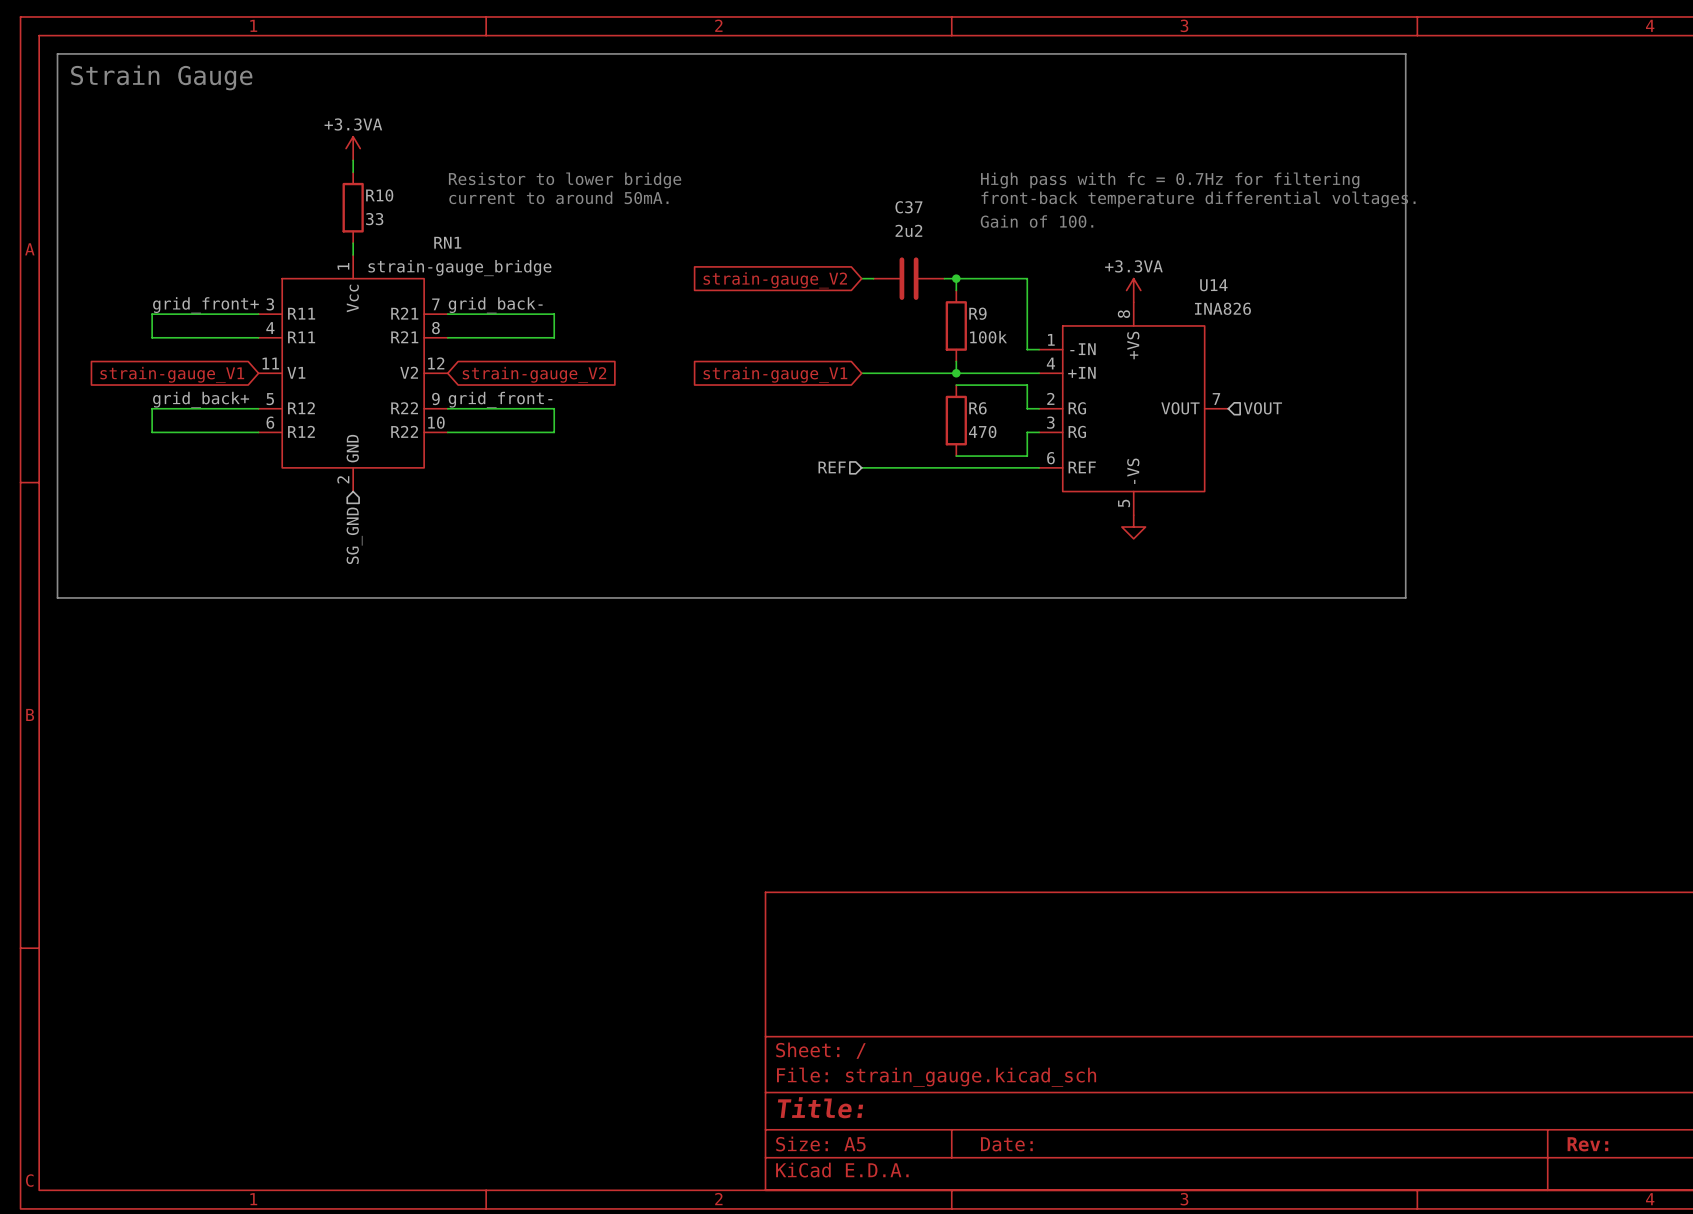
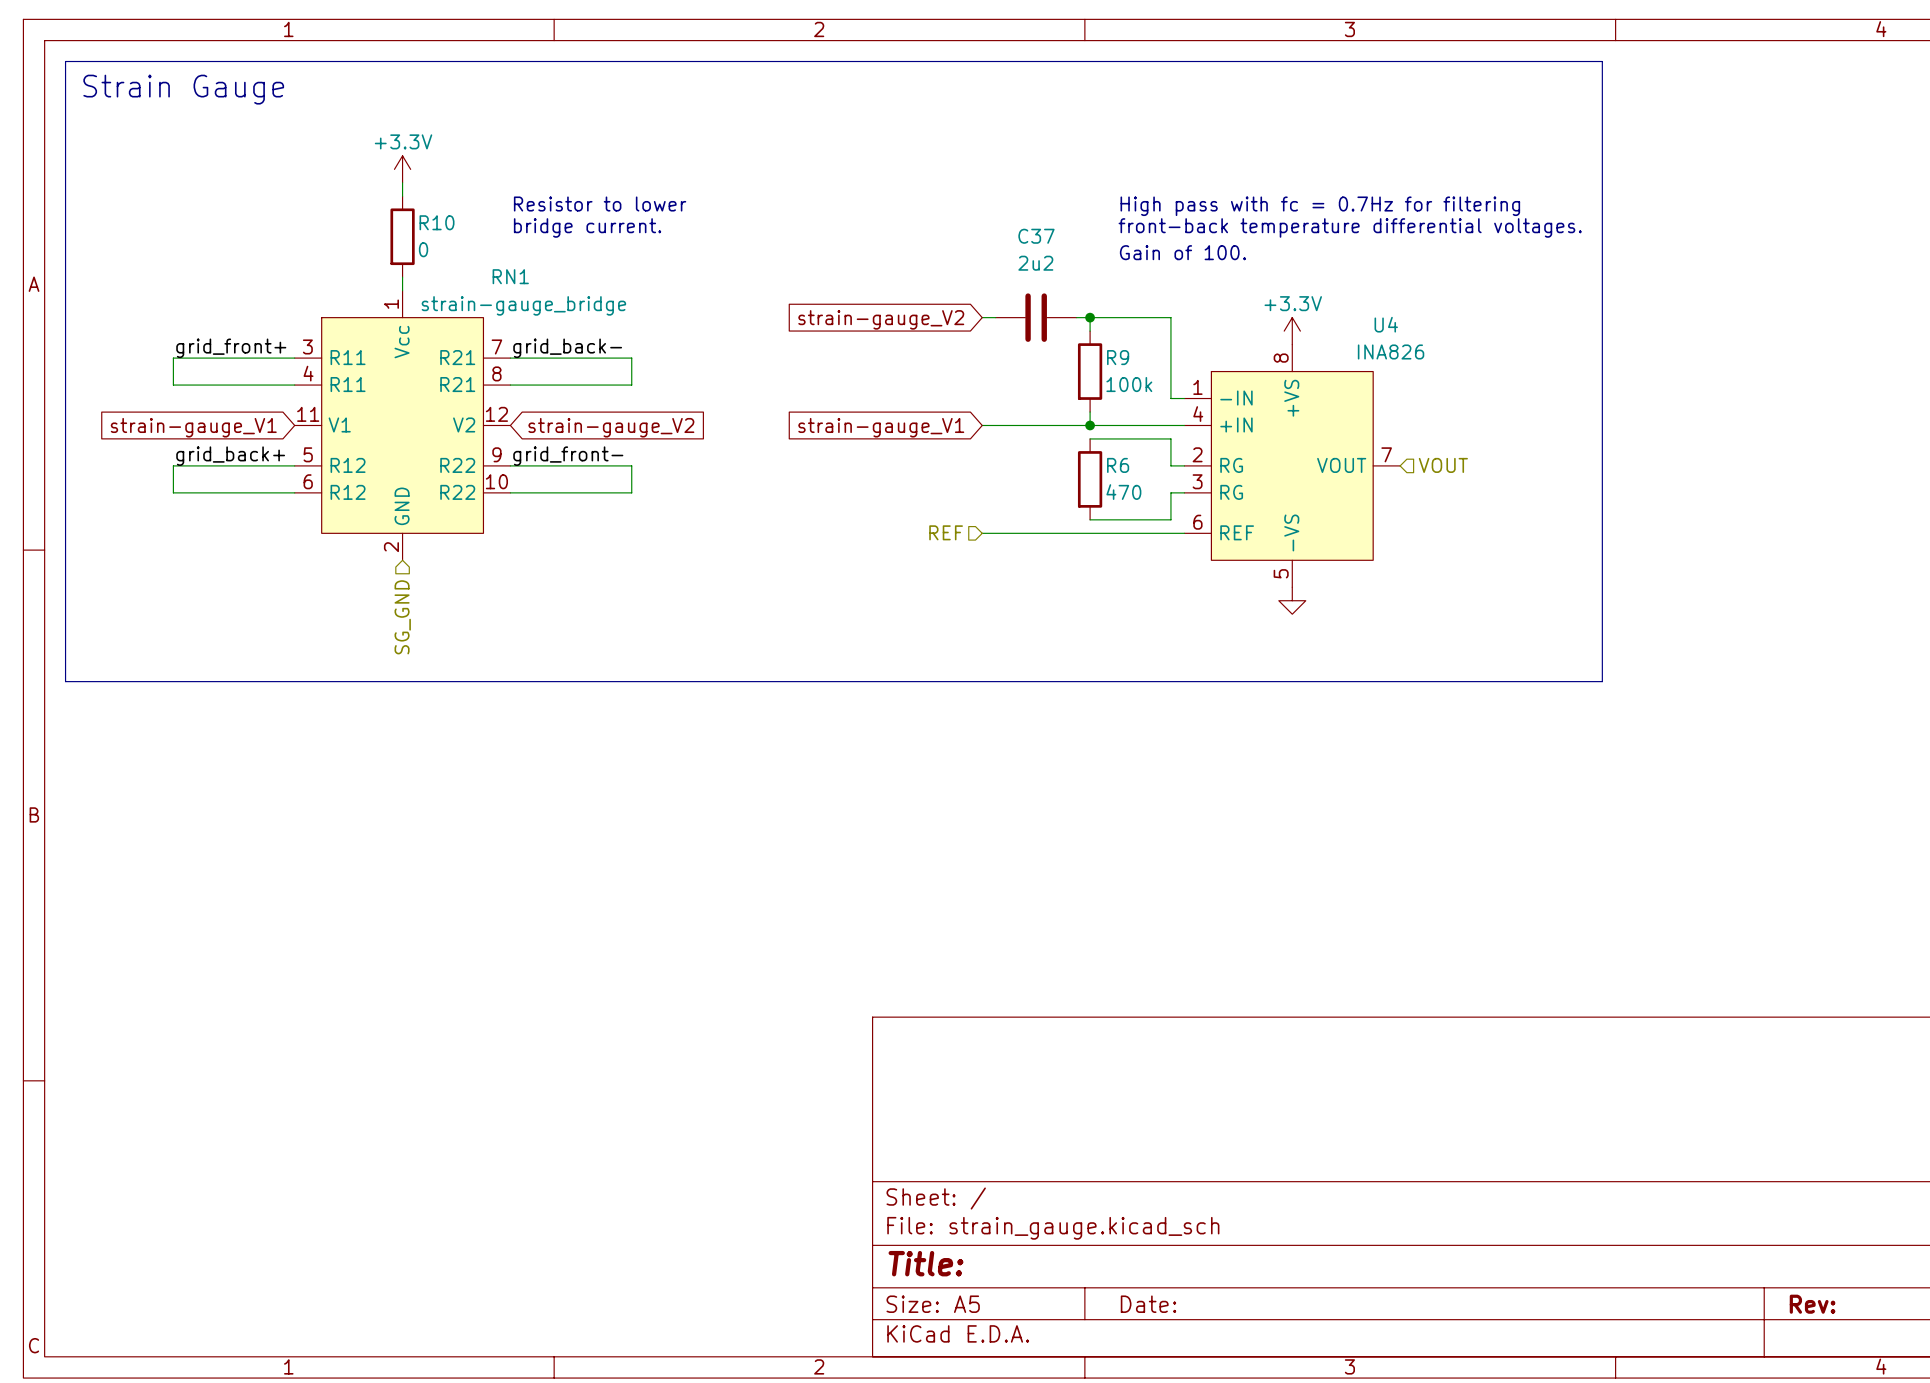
power symbol: +3.3VA (353, 148) -> +3.3V (402, 169)
text: Resistor to lower bridge (565, 180) -> Resistor to lower (600, 204)
text: current to around 50mA. (558, 197) -> bridge current. (587, 227)
R10 value: 33 (374, 219) -> 0 (423, 249)
U14 name: U14 (1213, 285) -> U4 (1386, 324)
power symbol: +3.3VA (1133, 290) -> +3.3V (1292, 331)

